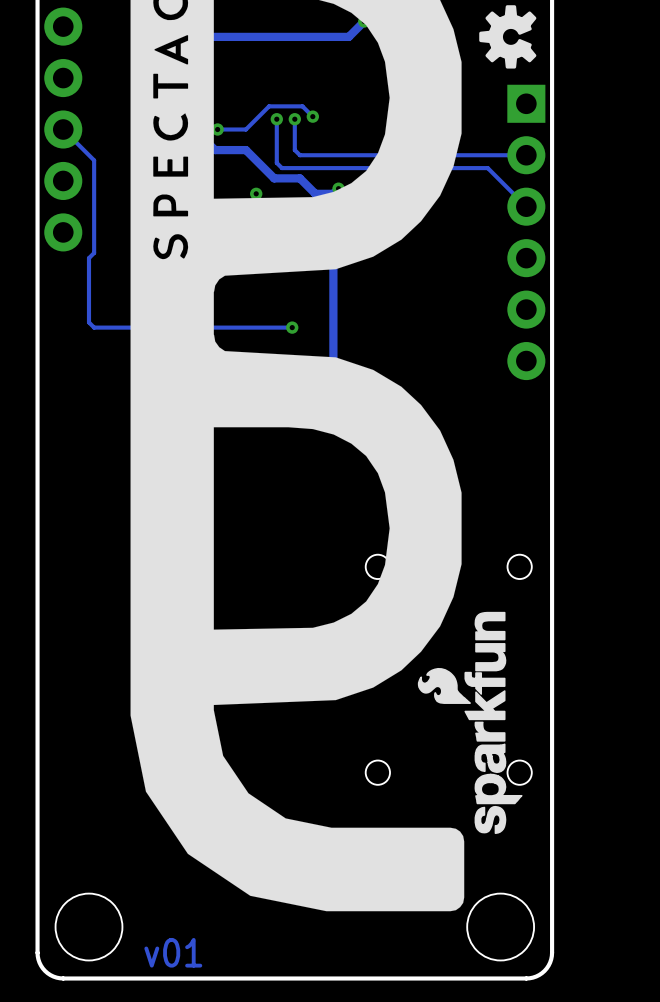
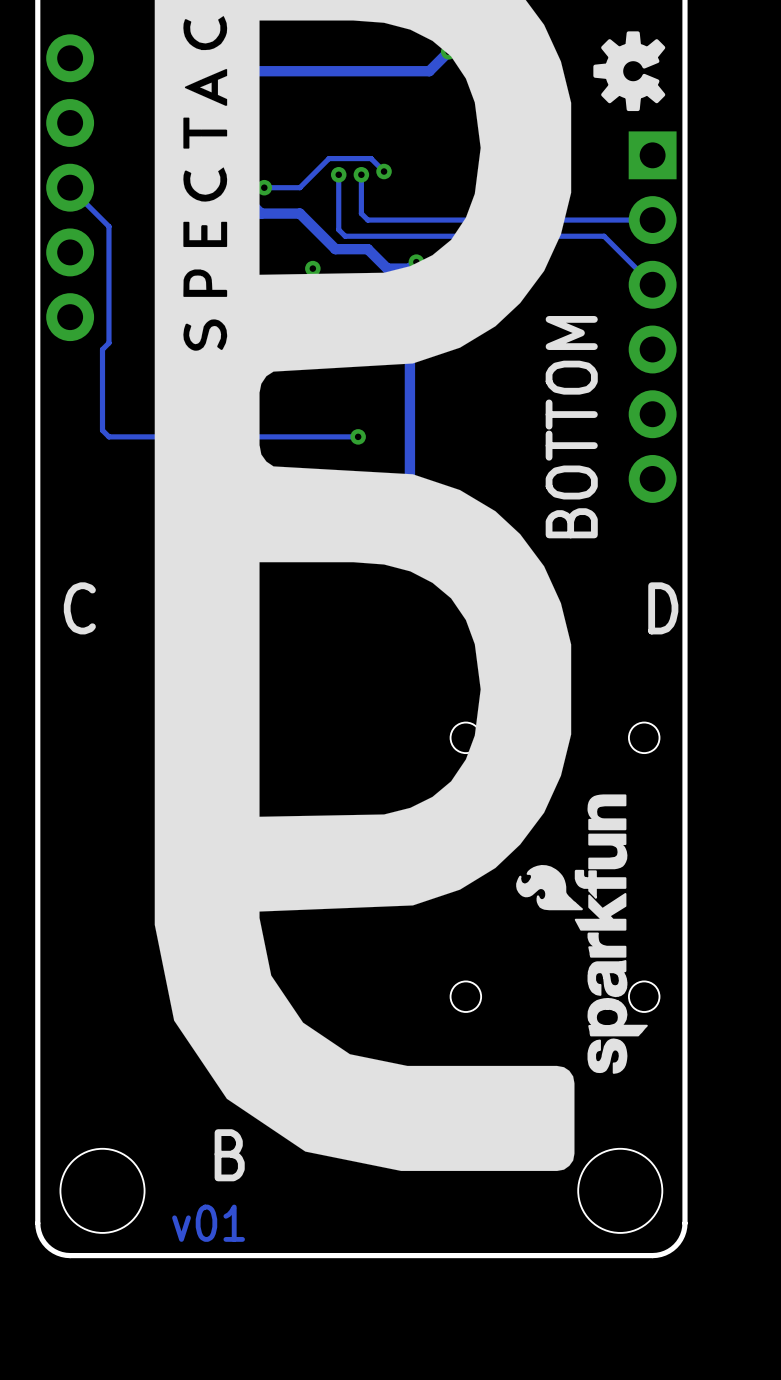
text: none -> BOTTOM (571, 427)
text: none -> C (79, 608)
text: none -> D (663, 608)
text: none -> B (229, 1155)

